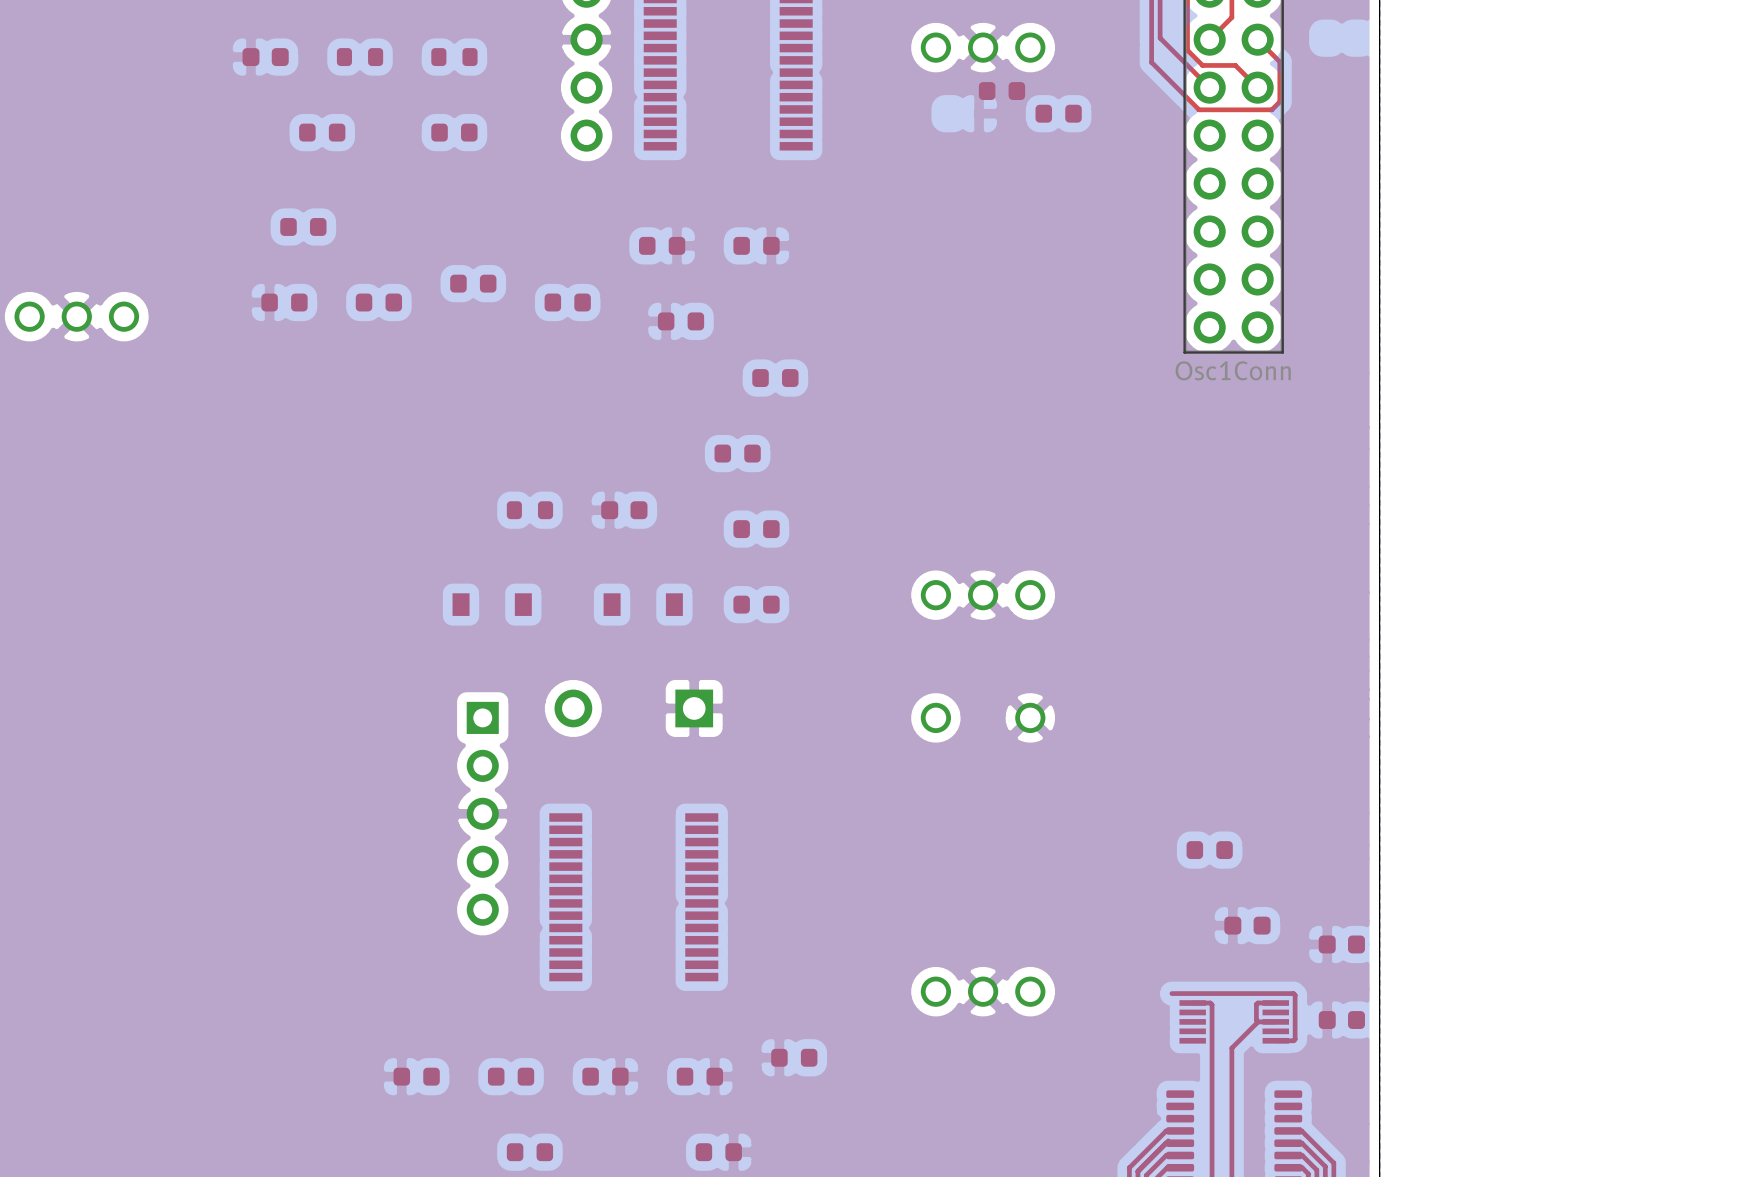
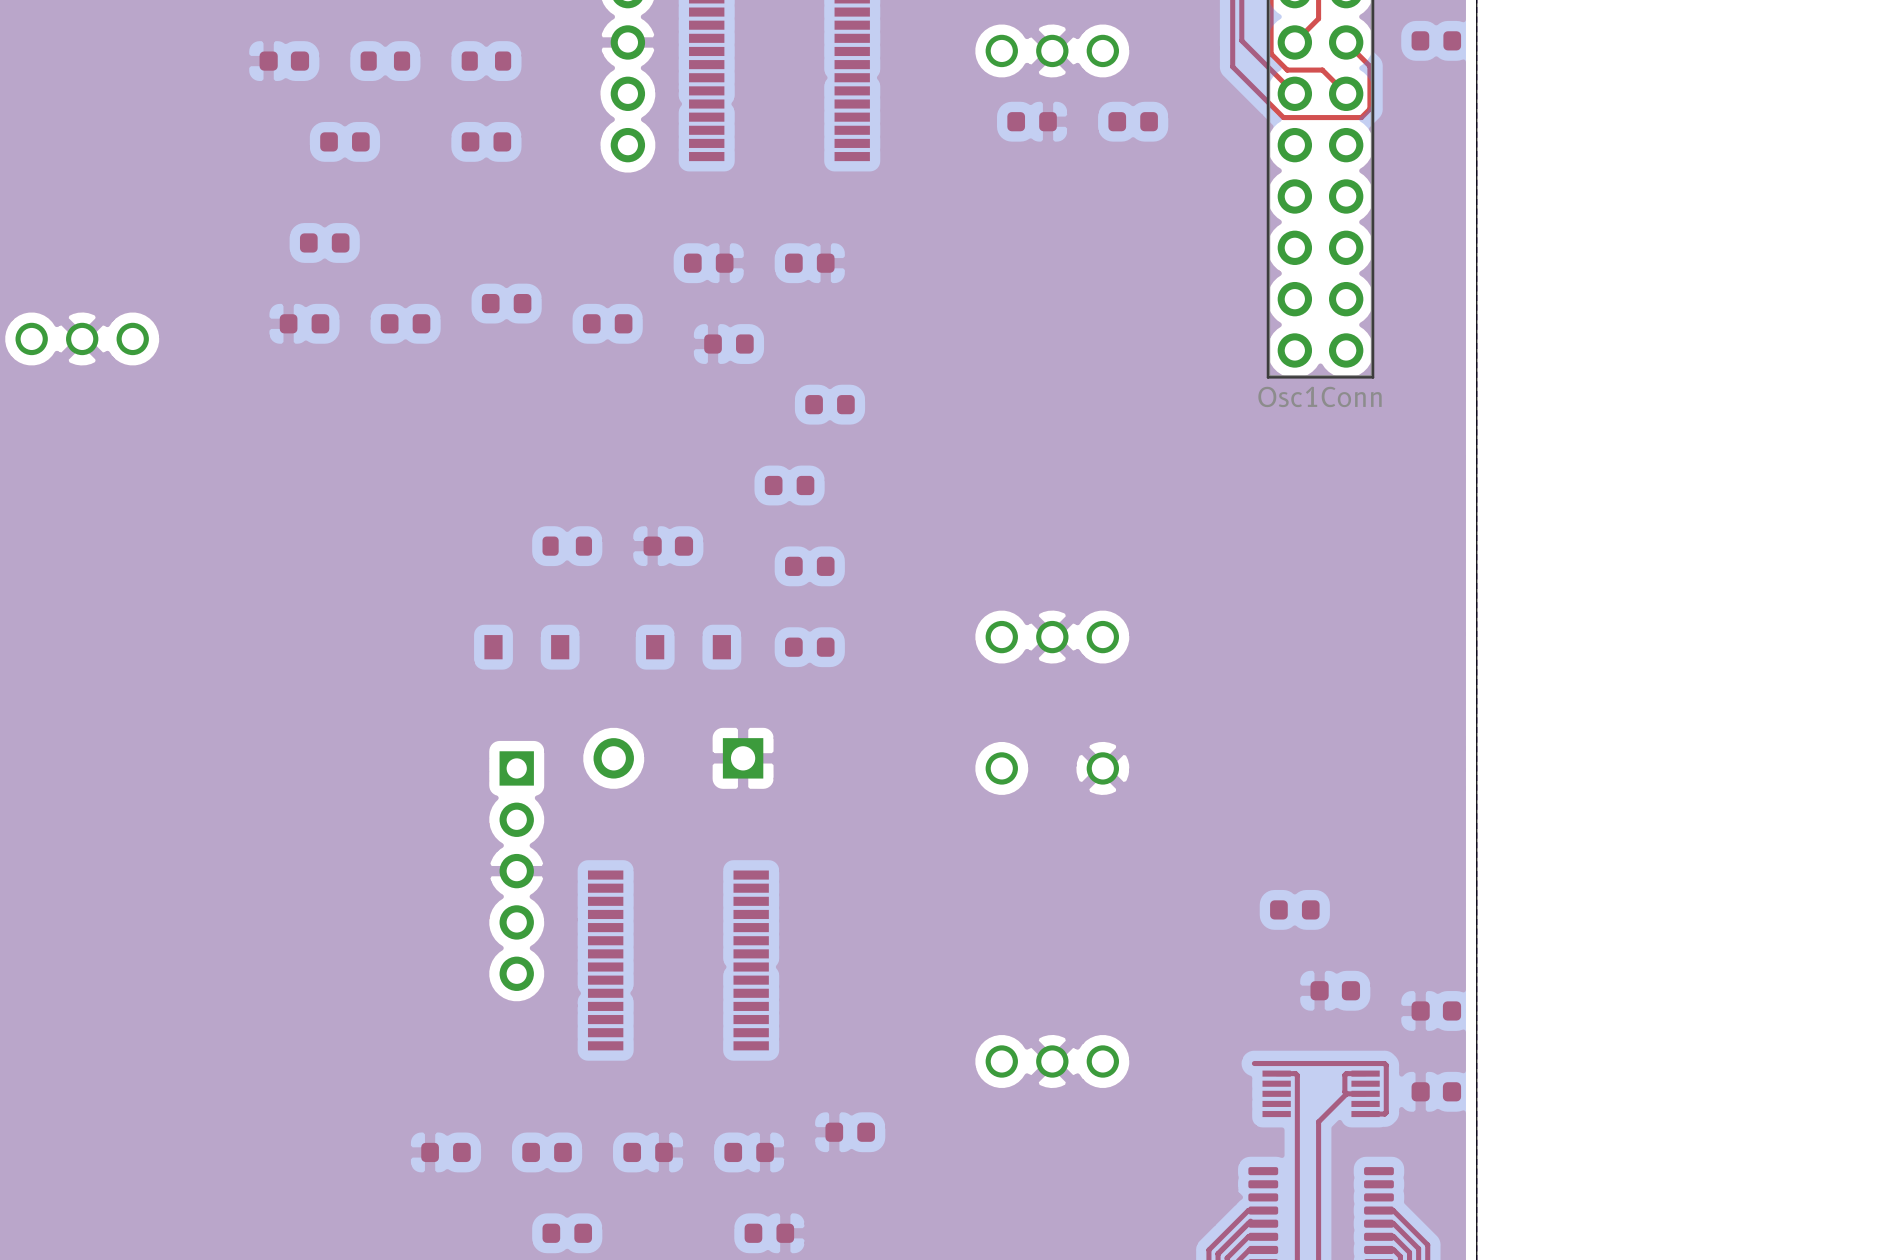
part: none -> (1436, 40)
part position: (1001, 91) -> (1032, 121)

